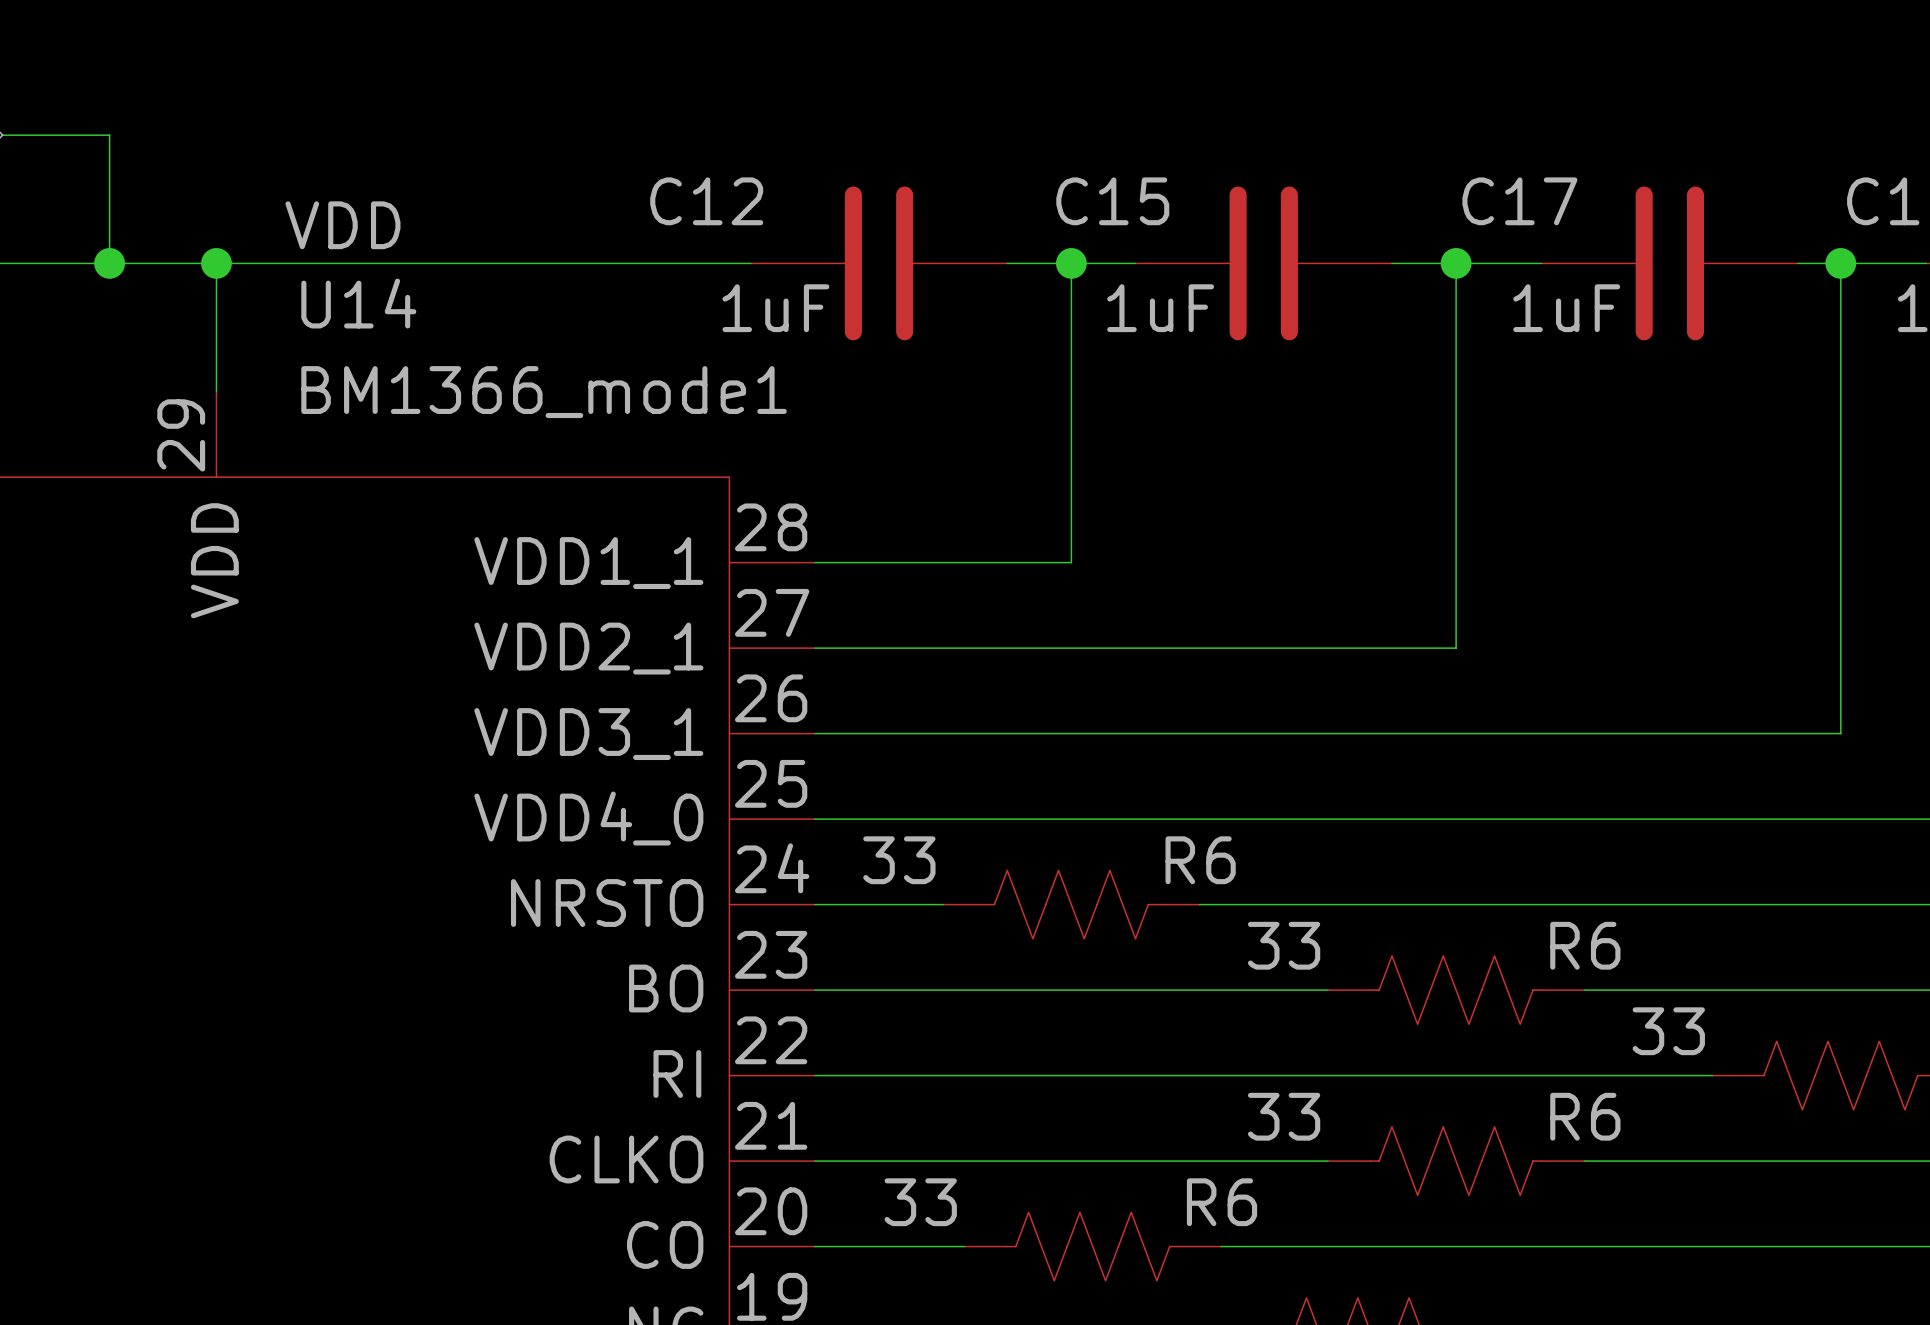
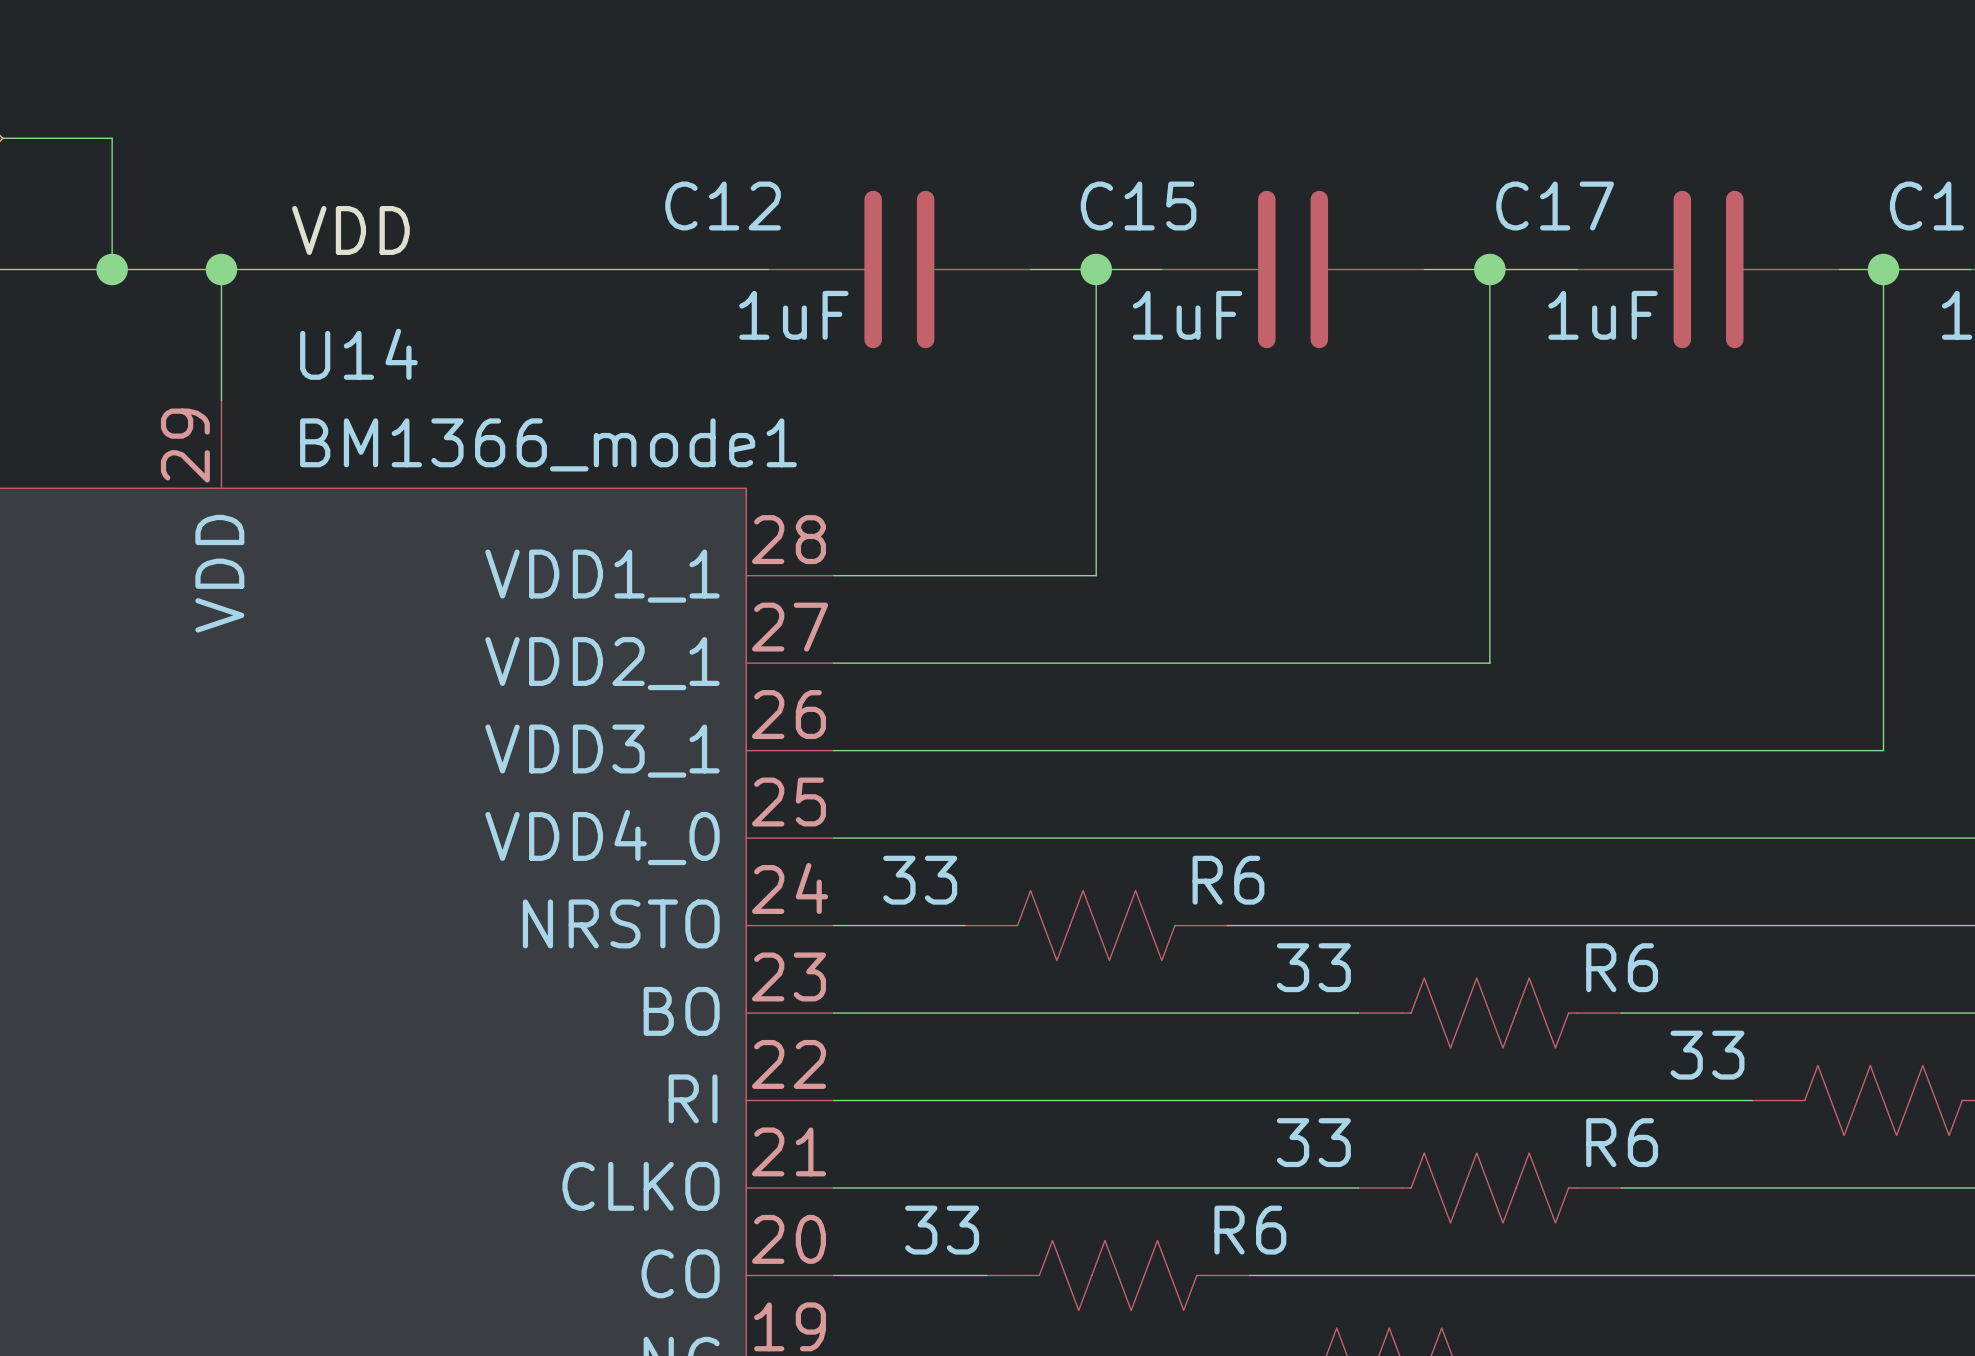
U14 name position: U14 (358, 303) -> U14 (358, 354)
U14 value position: BM1366_mode1 (544, 392) -> BM1366_mode1 (548, 444)

